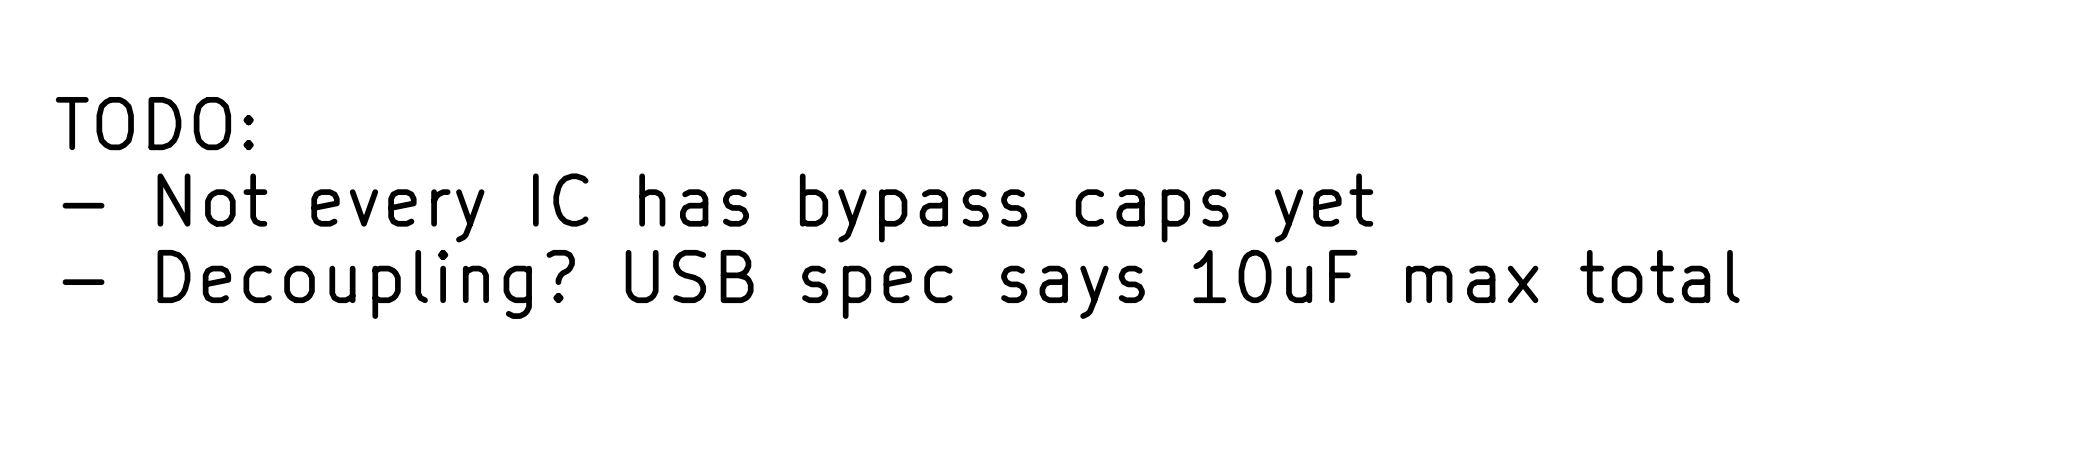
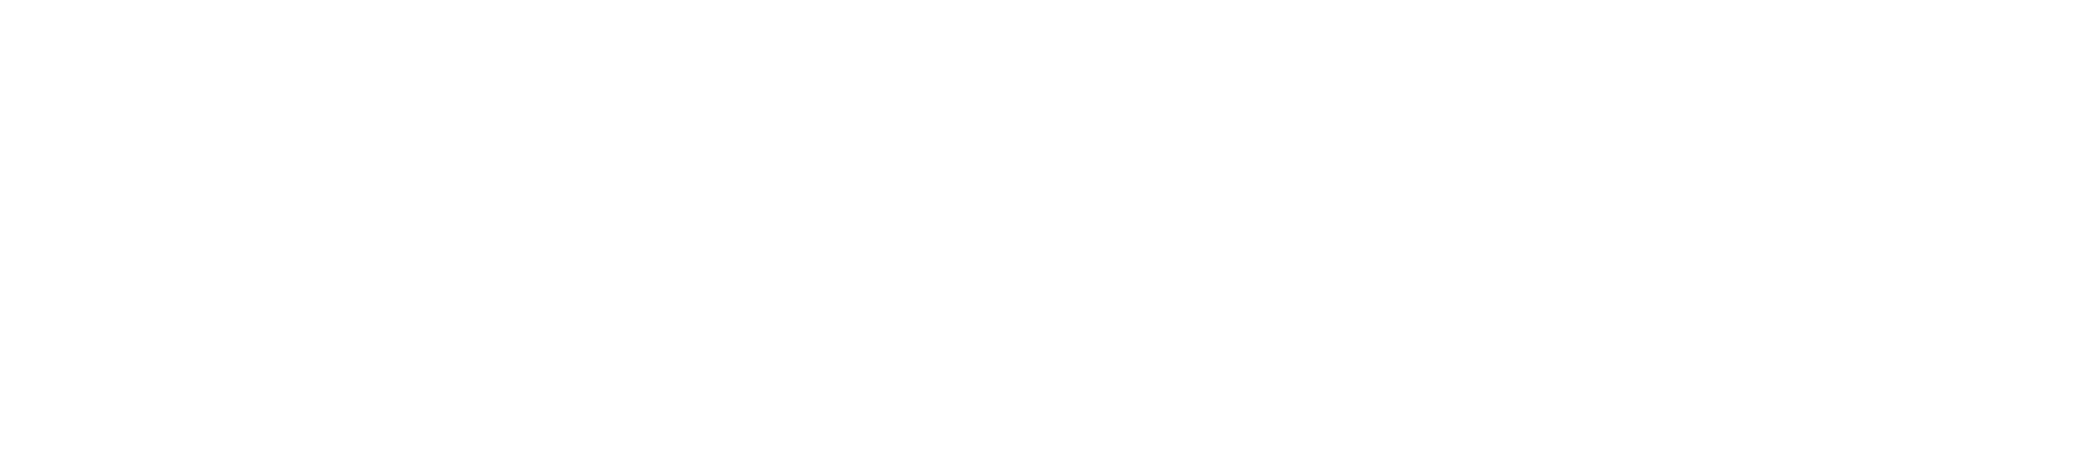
text: TODO: (154, 123) -> none
text: - Not every IC has bypass caps yet (717, 207) -> none
text: - Decoupling? USB spec says 10uF max total (901, 284) -> none

